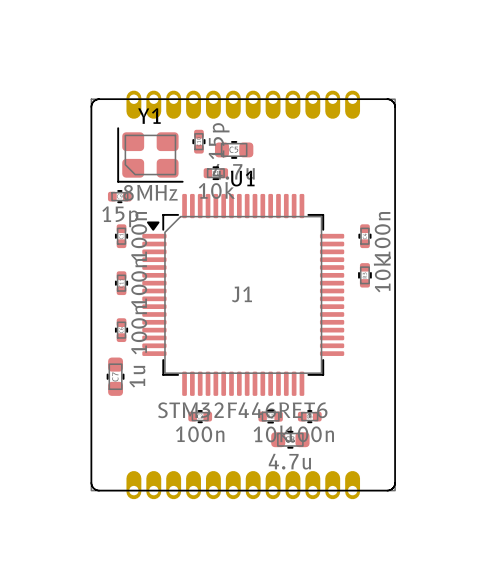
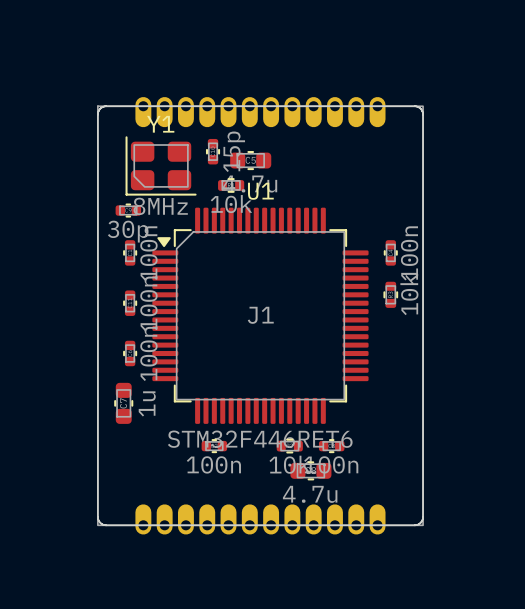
part value: 15p (120, 216) -> 30p (128, 231)

